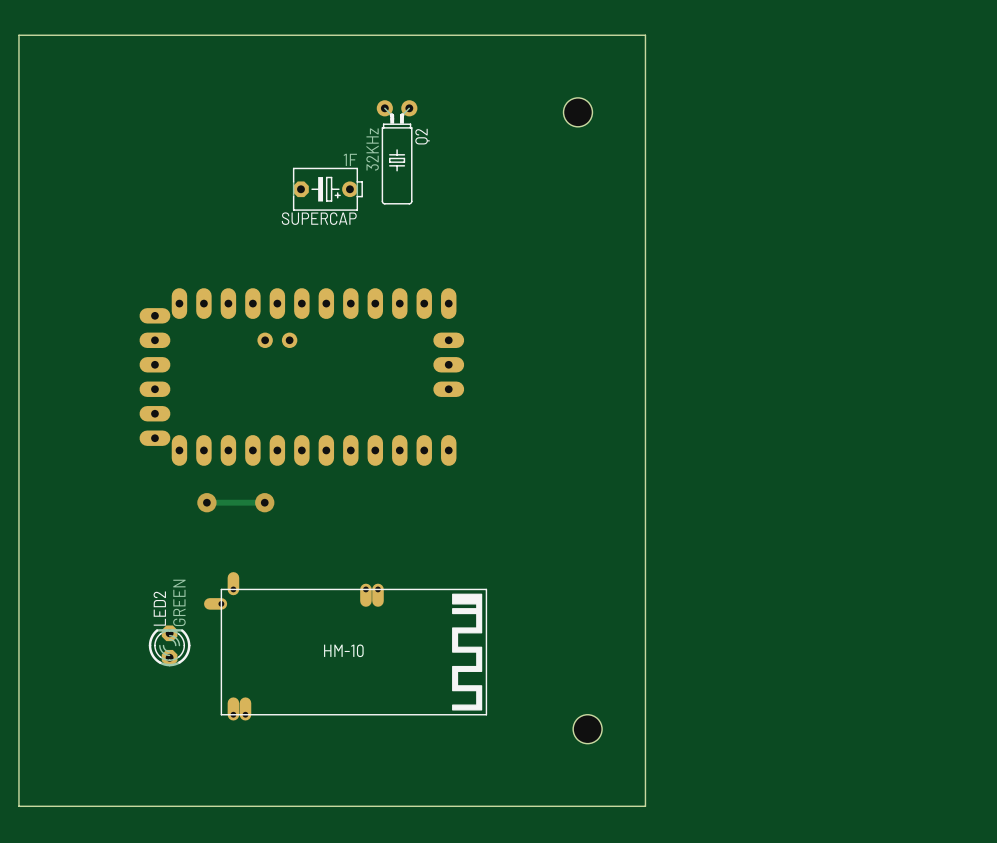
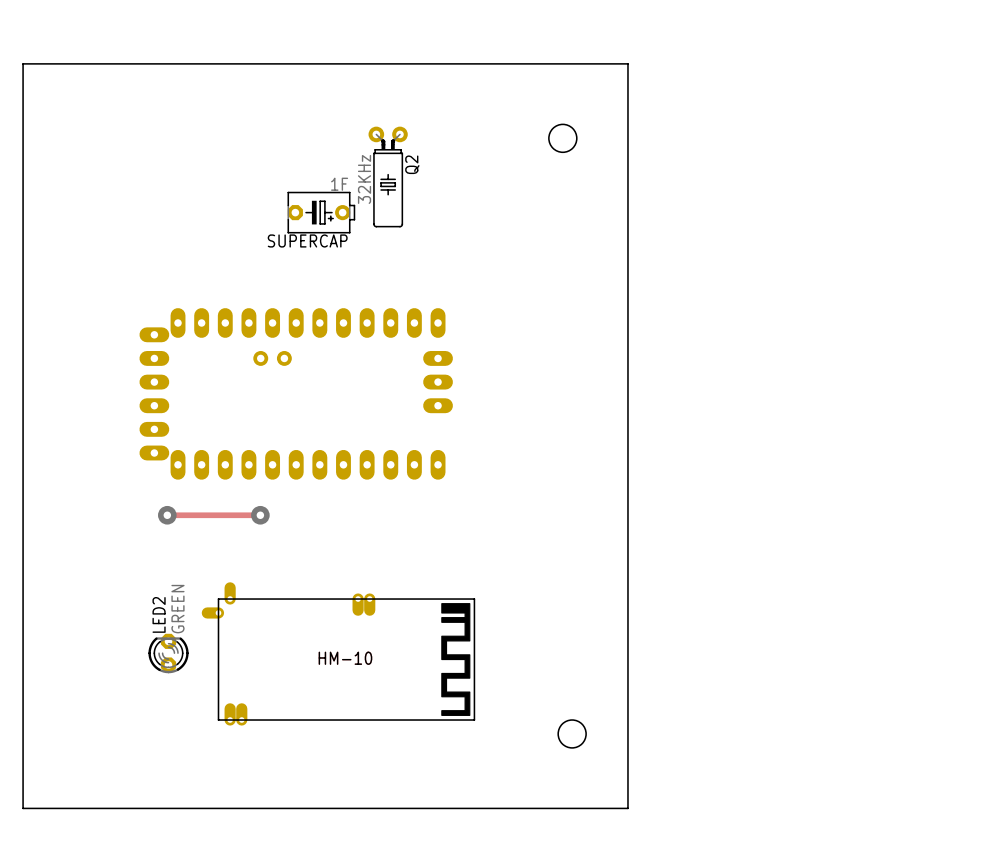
track: none -> (167, 515) (204, 515)
via position: (206, 502) -> (167, 515)

